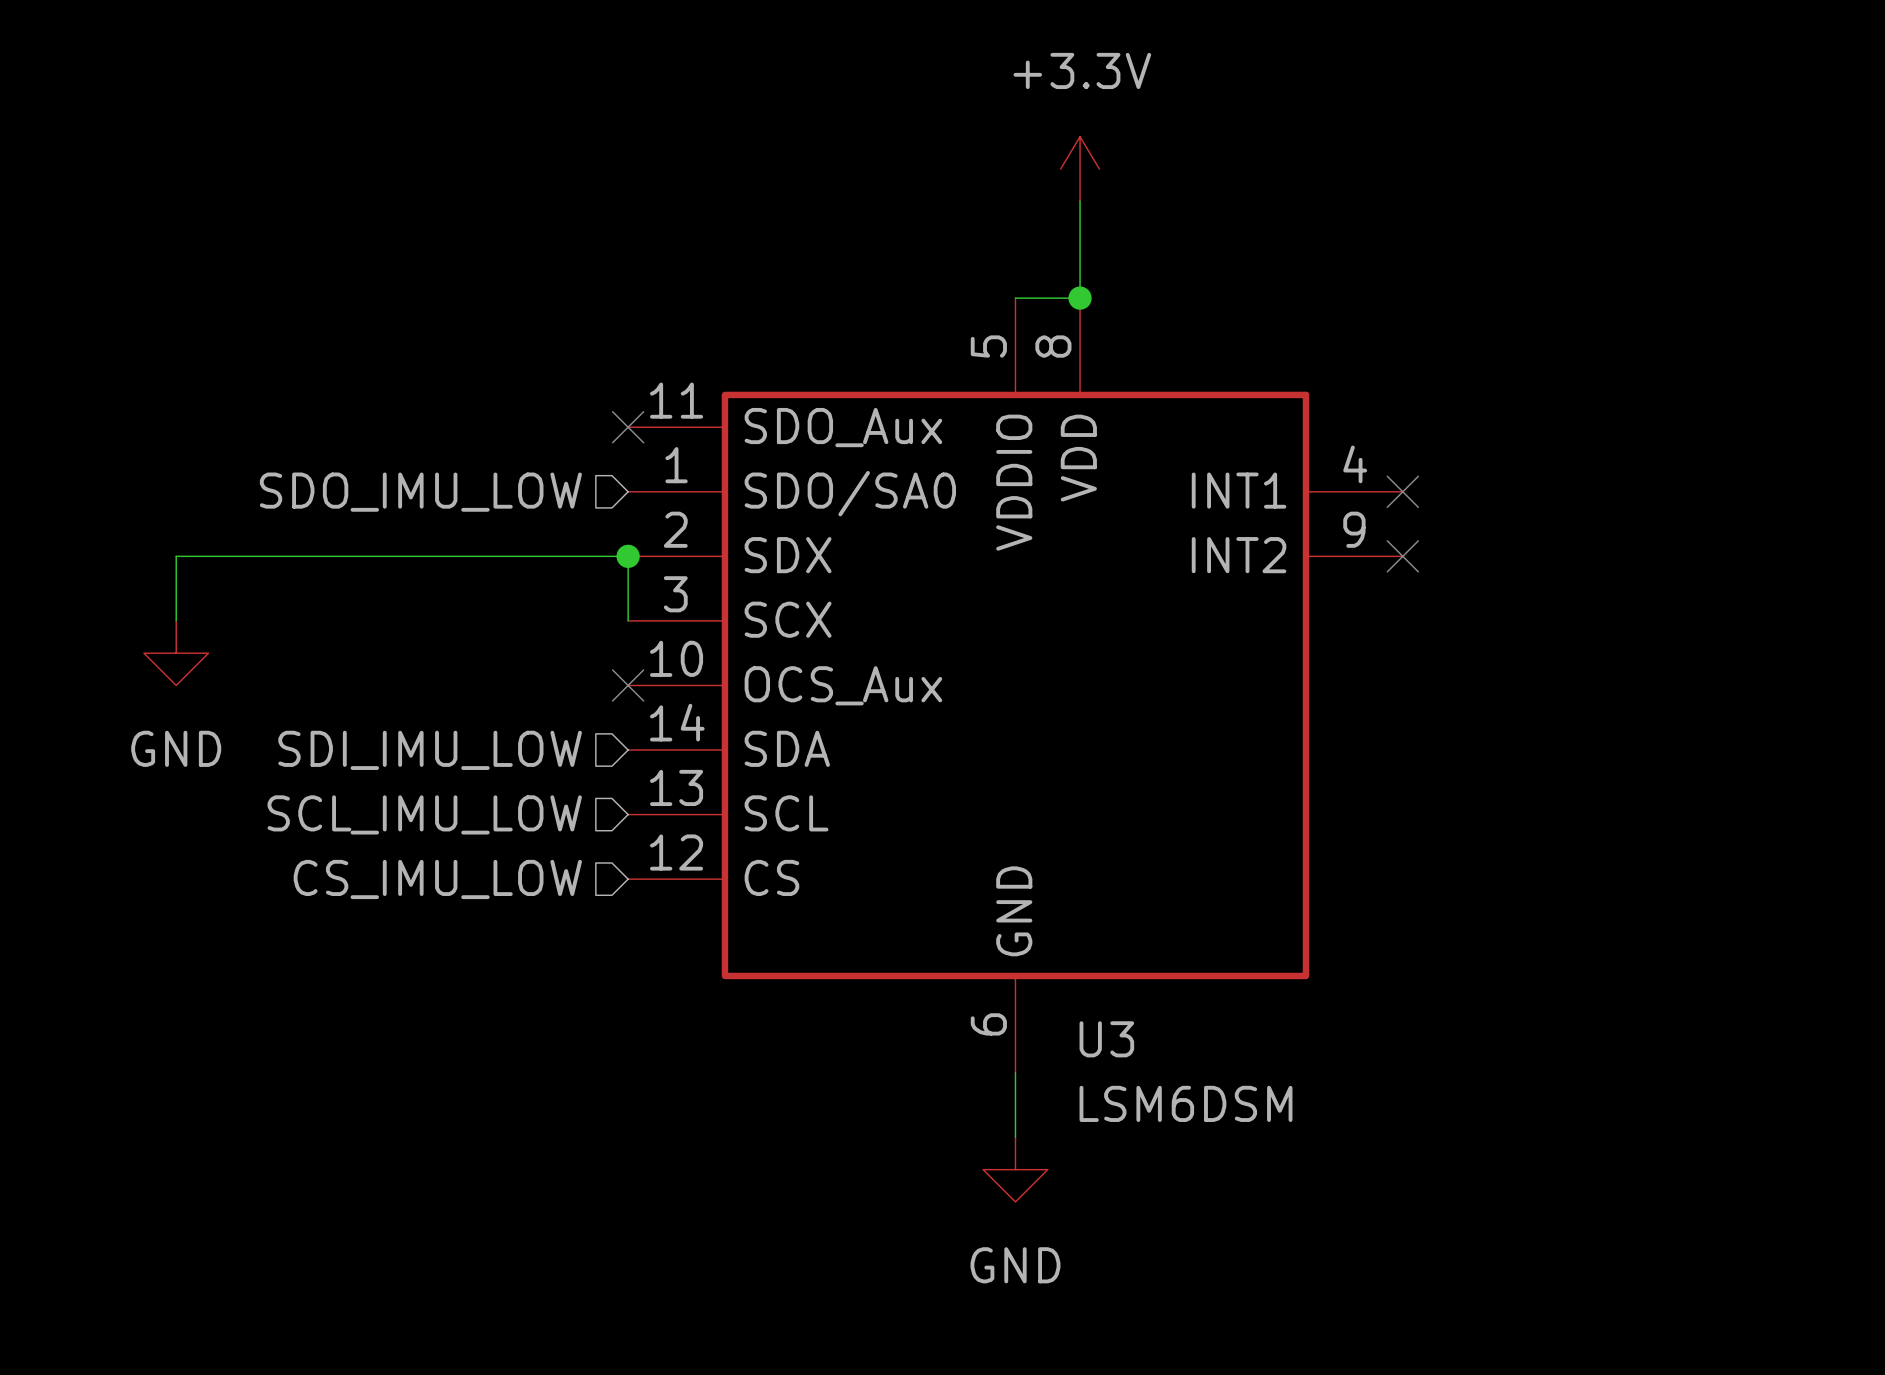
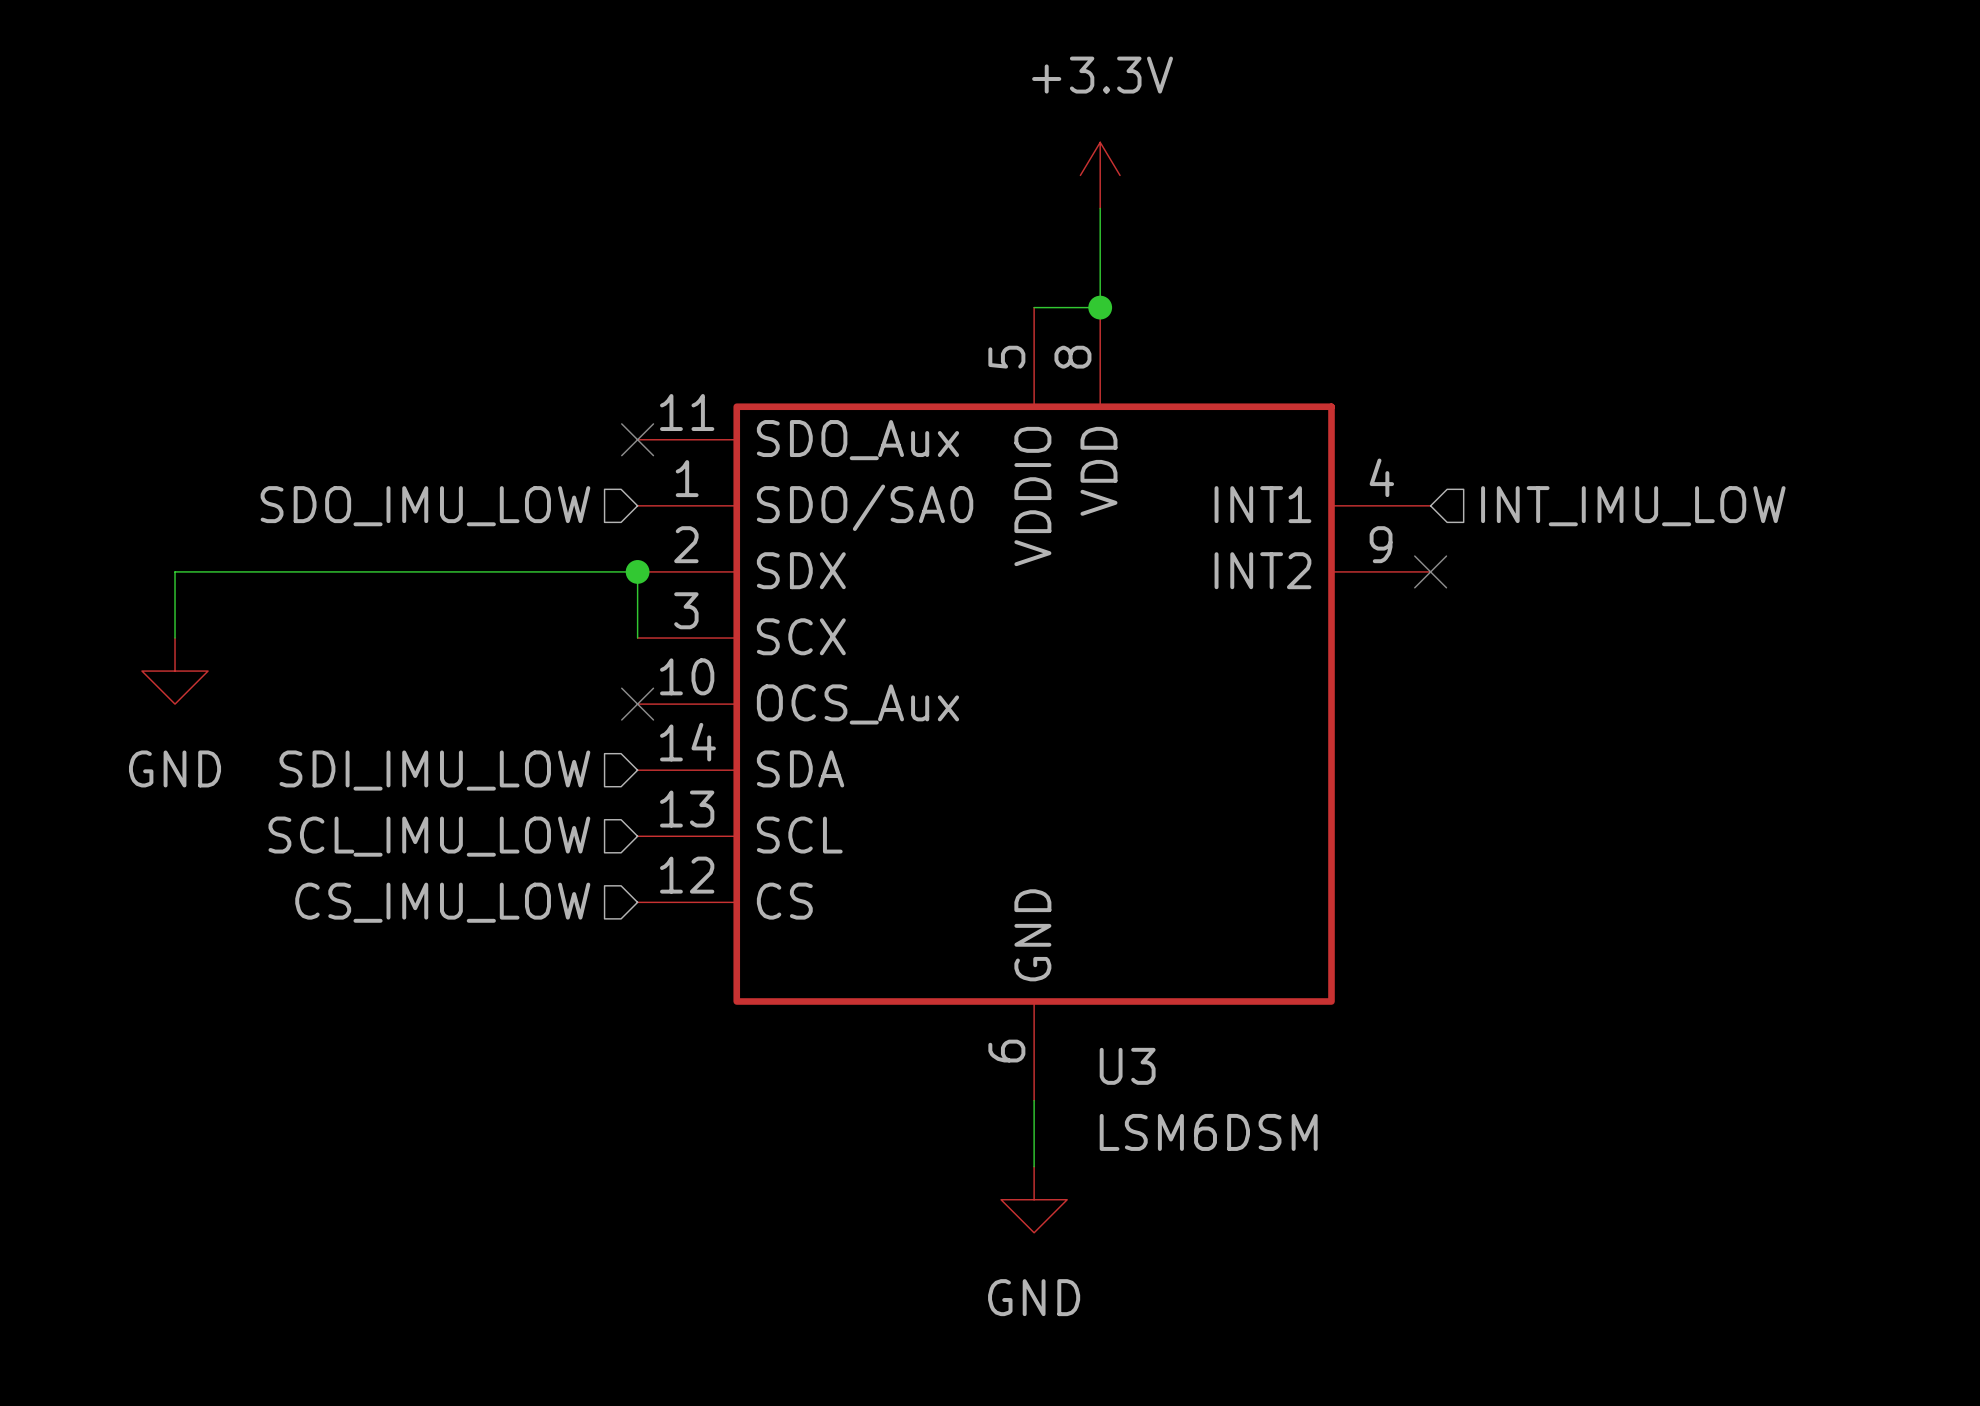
no-connect mark: (1402, 491) -> none
hierarchical label: none -> INT_IMU_LOW (1633, 506)

